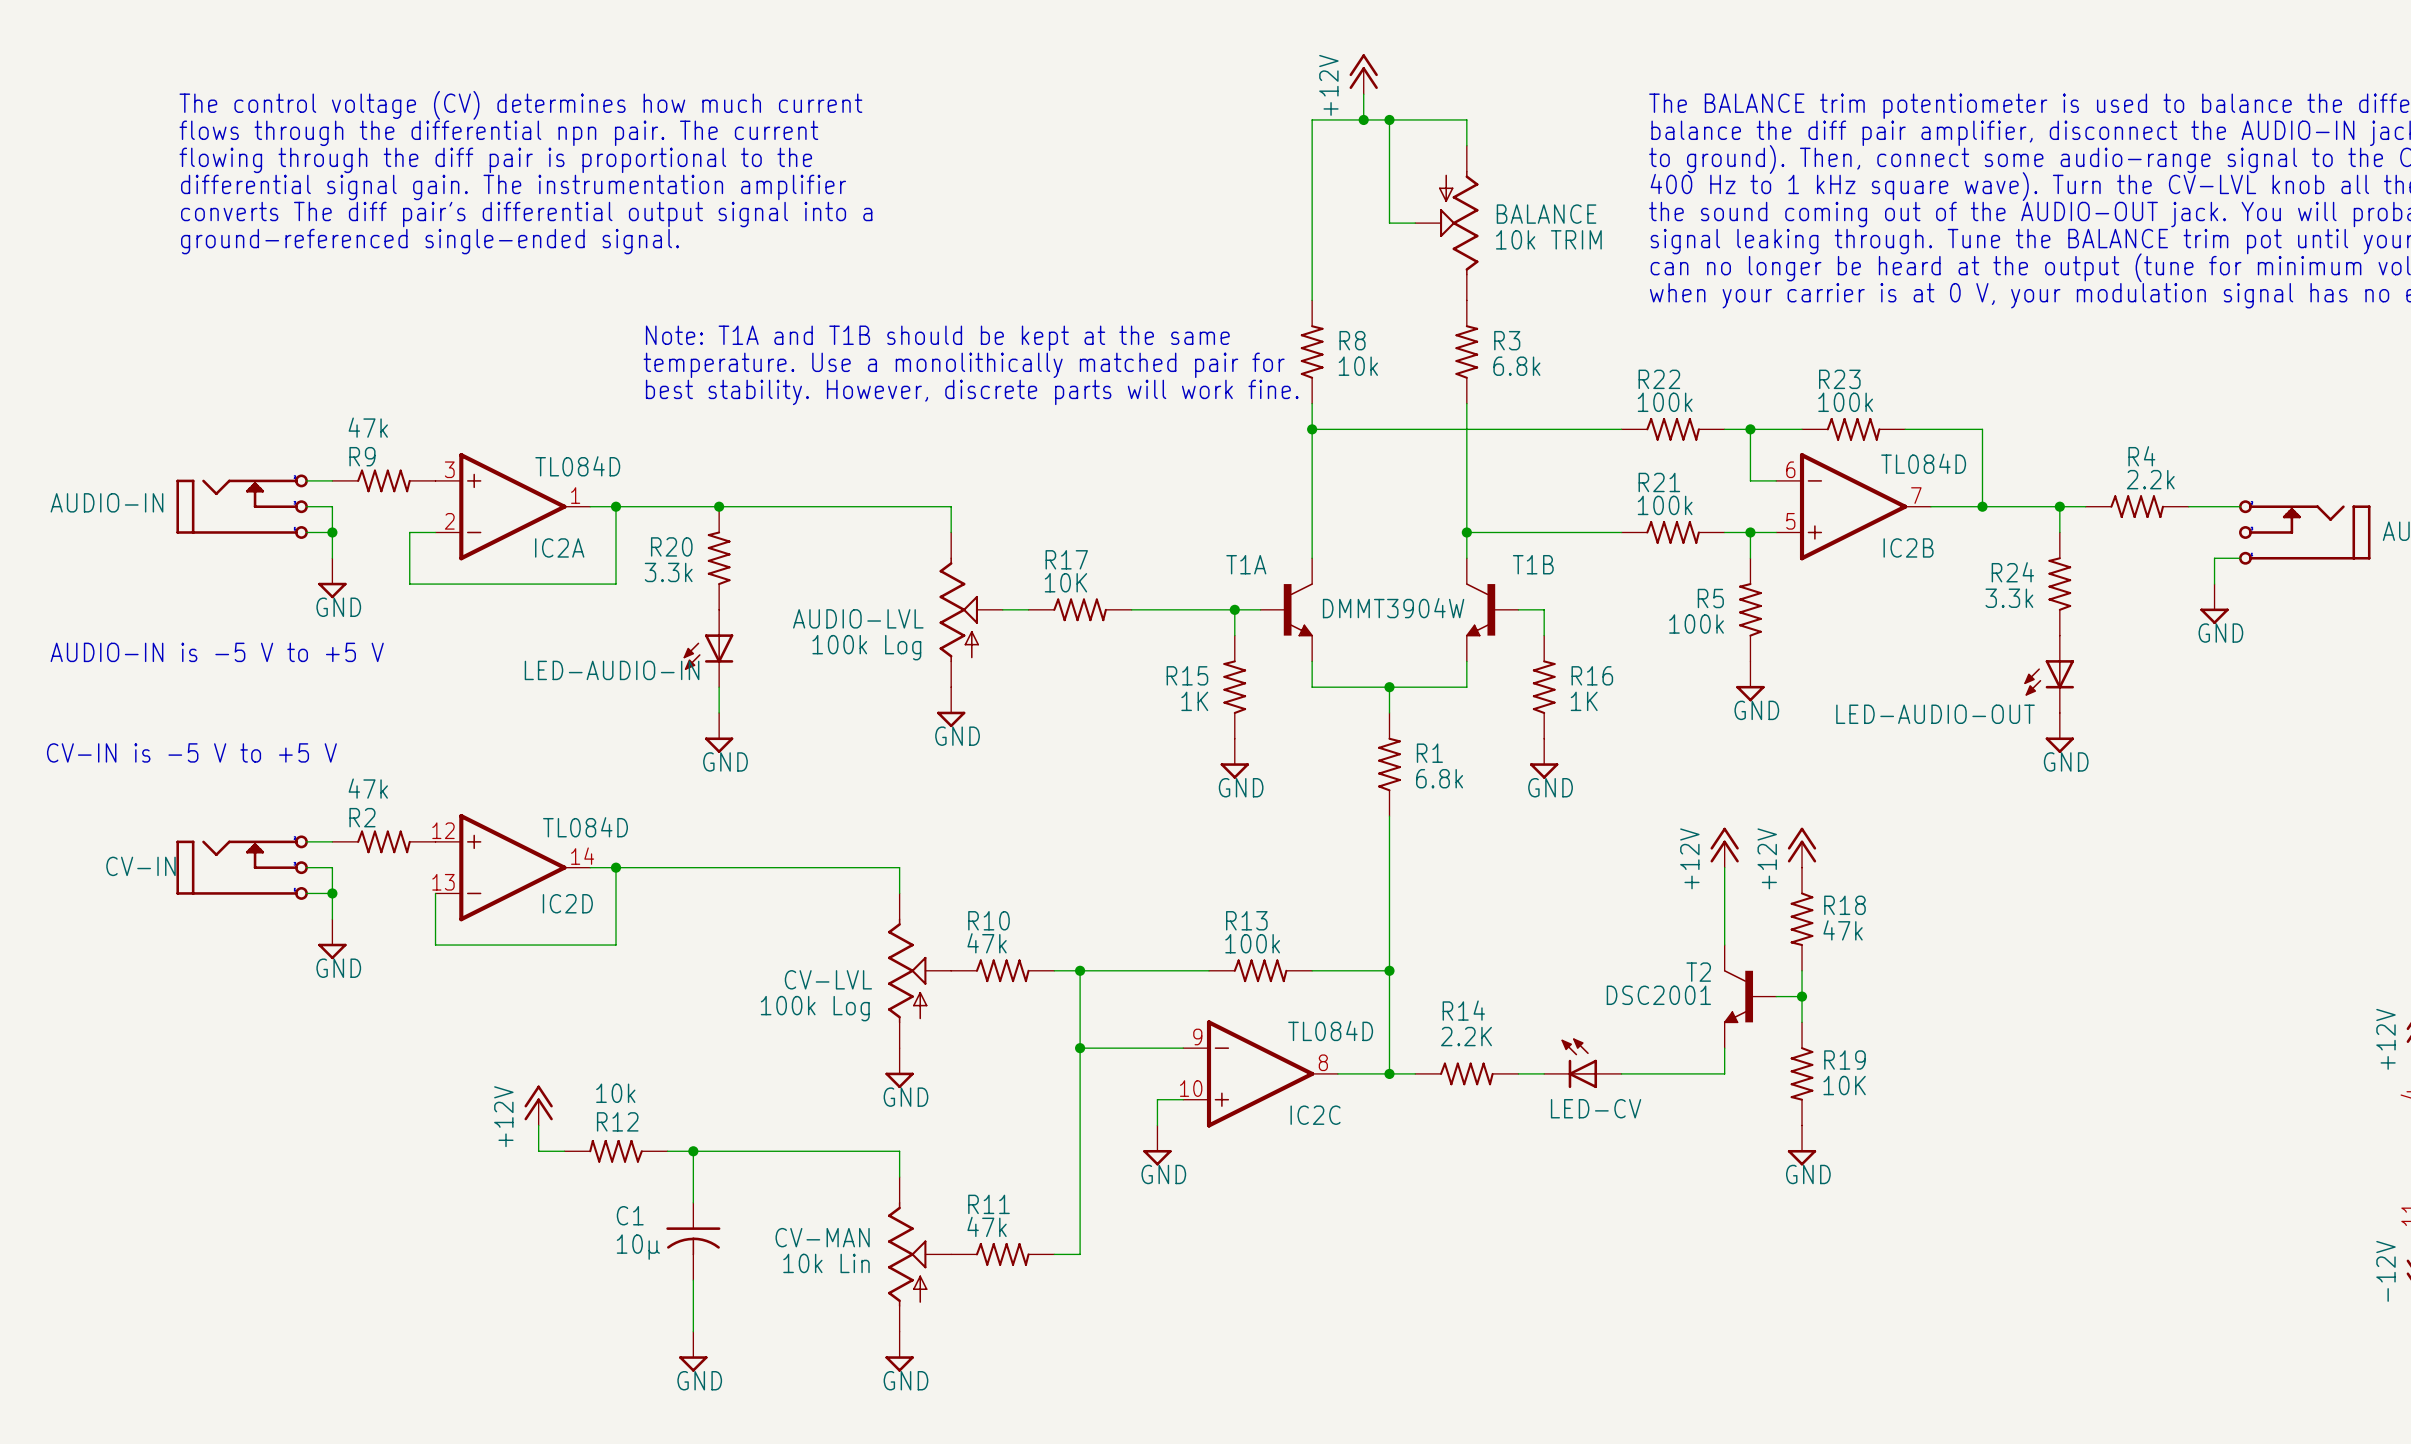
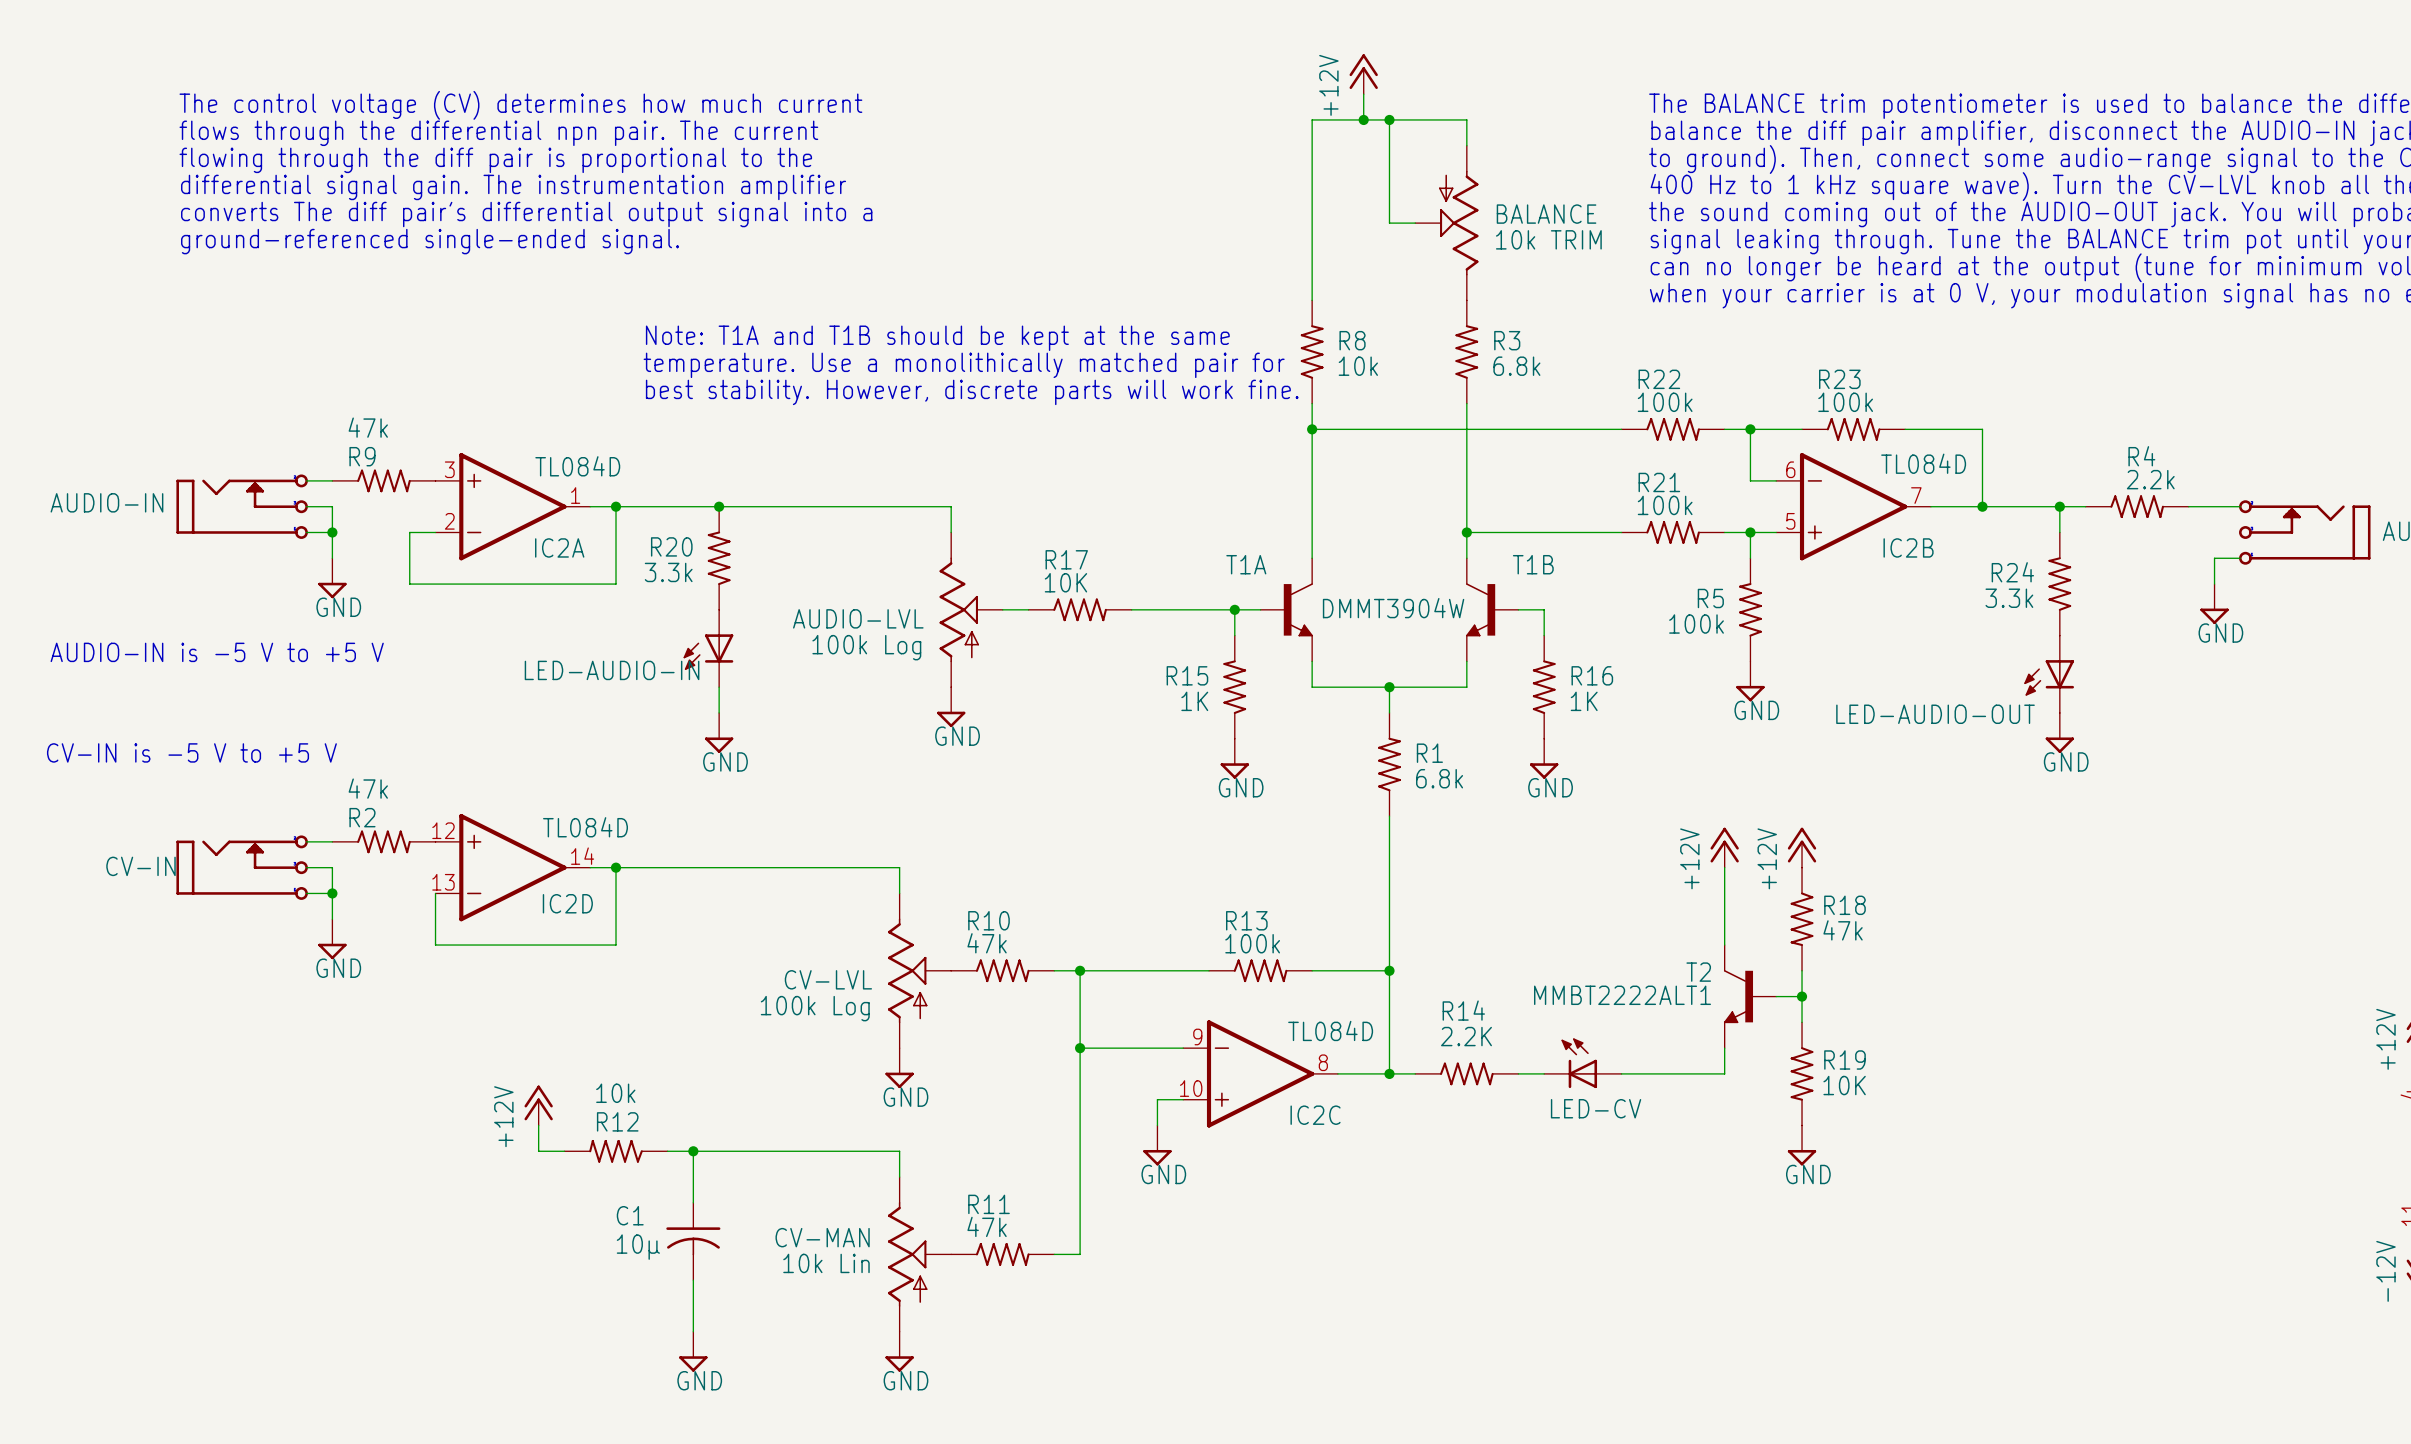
T2 value: DSC2001 (1658, 995) -> MMBT2222ALT1 (1622, 995)

